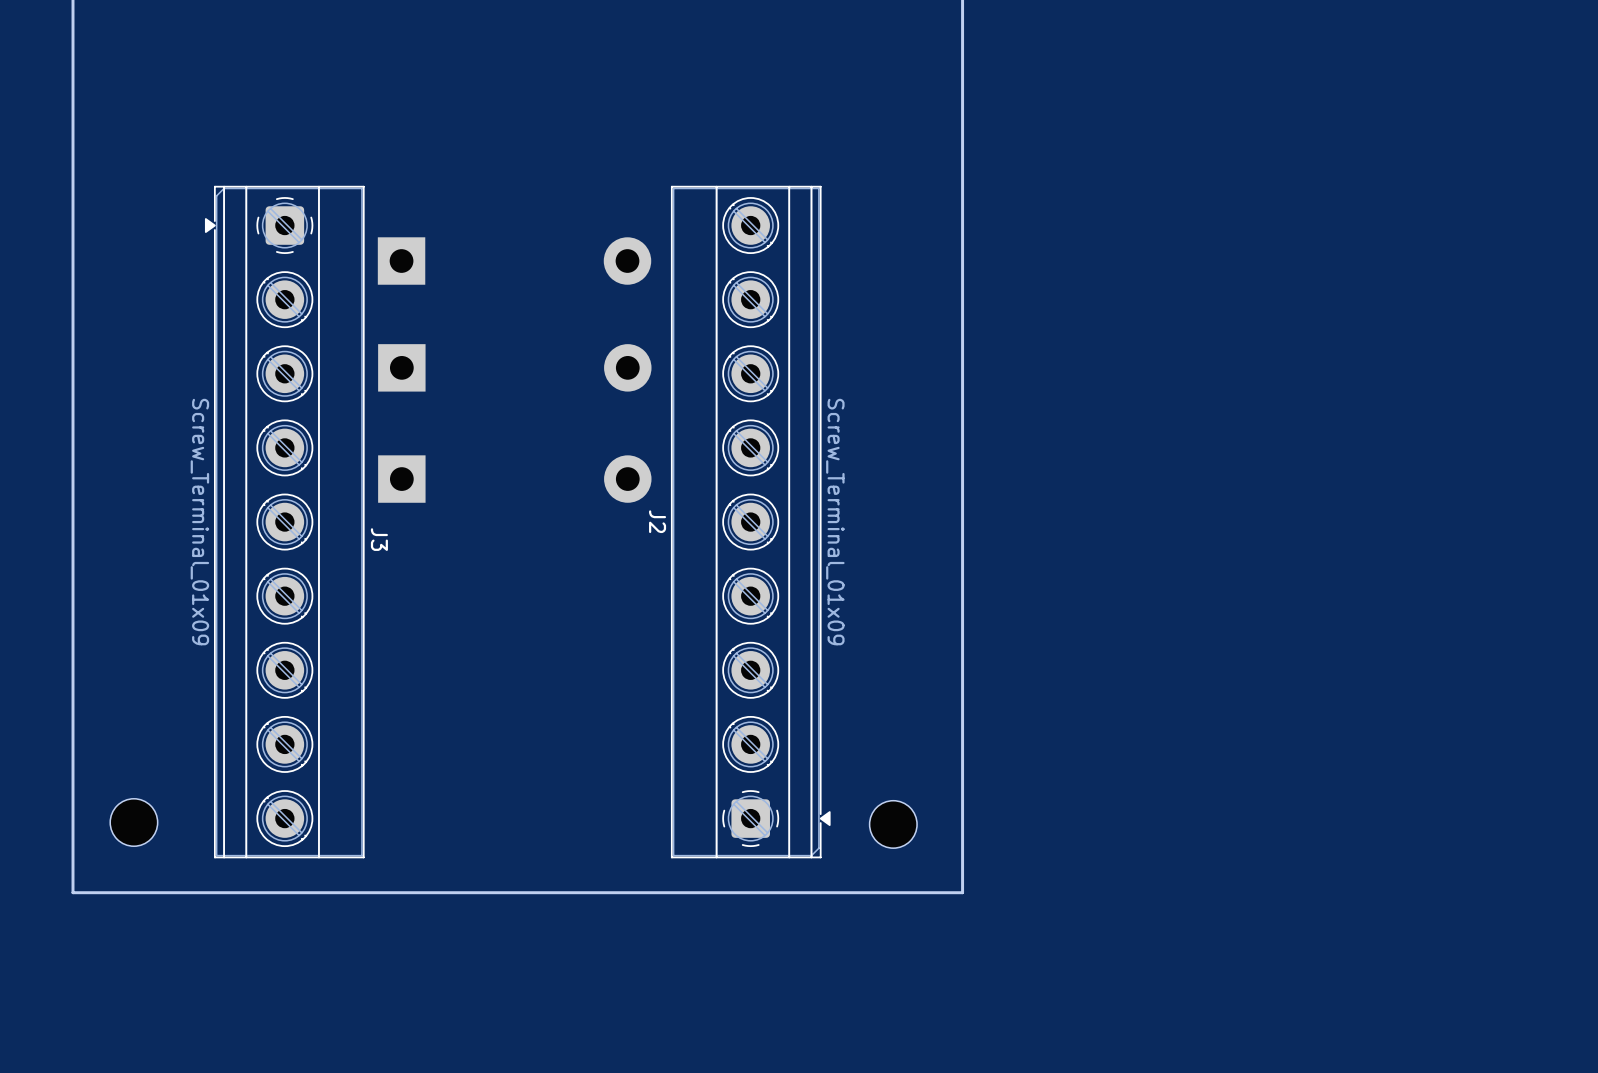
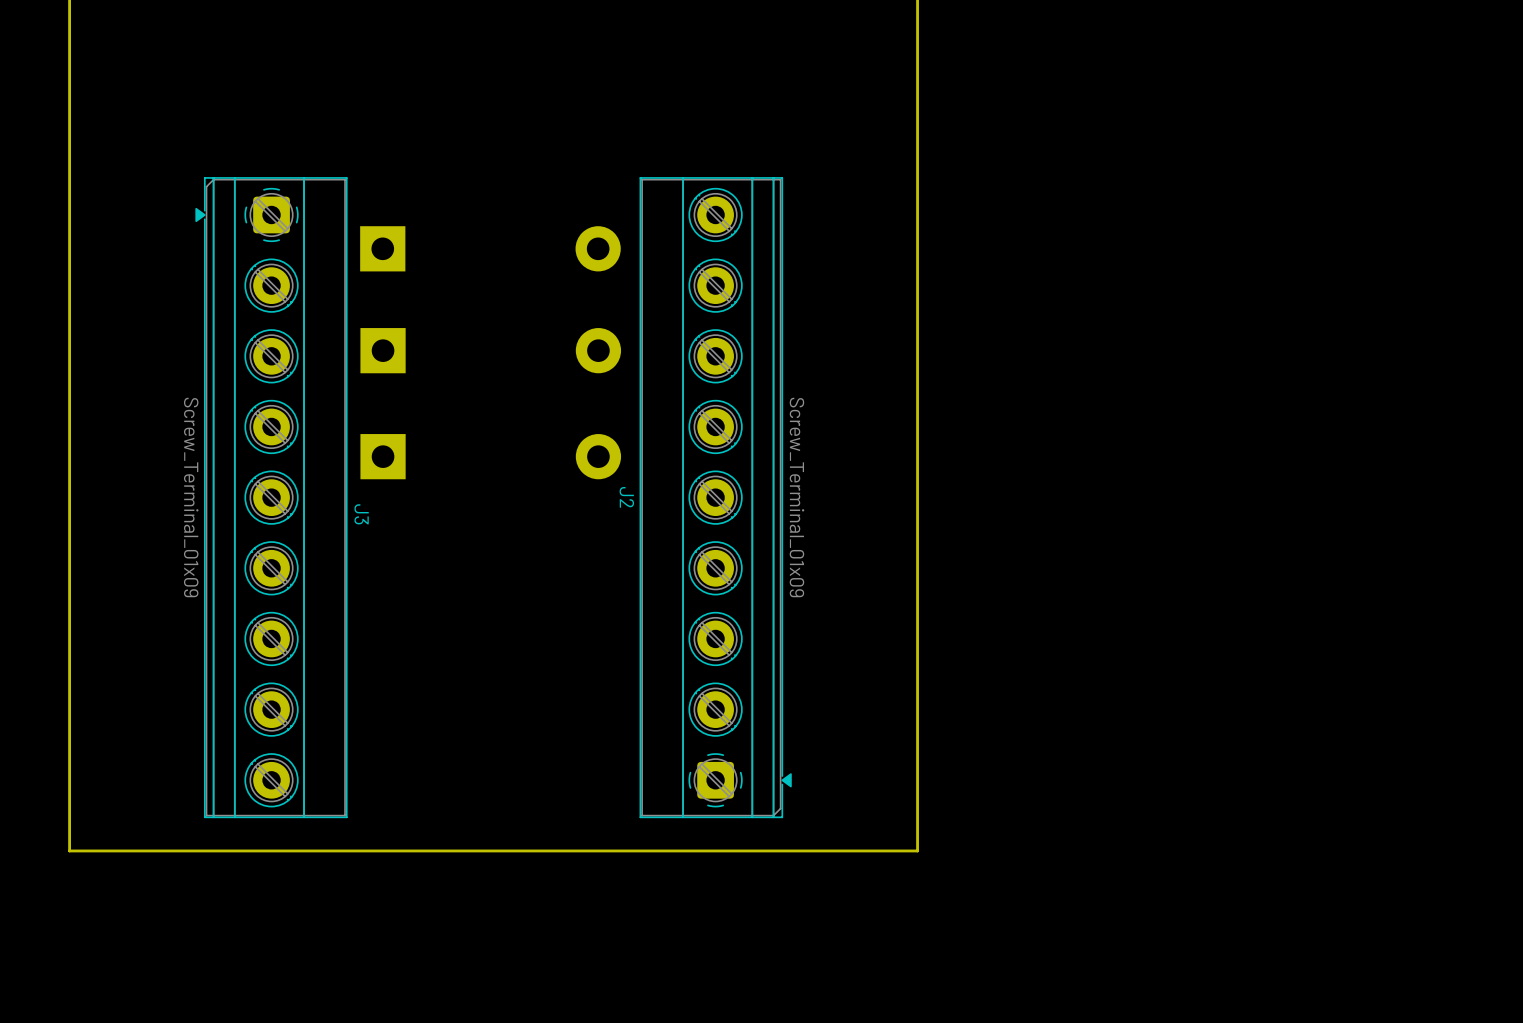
part: (133, 822) -> none
part: (893, 824) -> none

